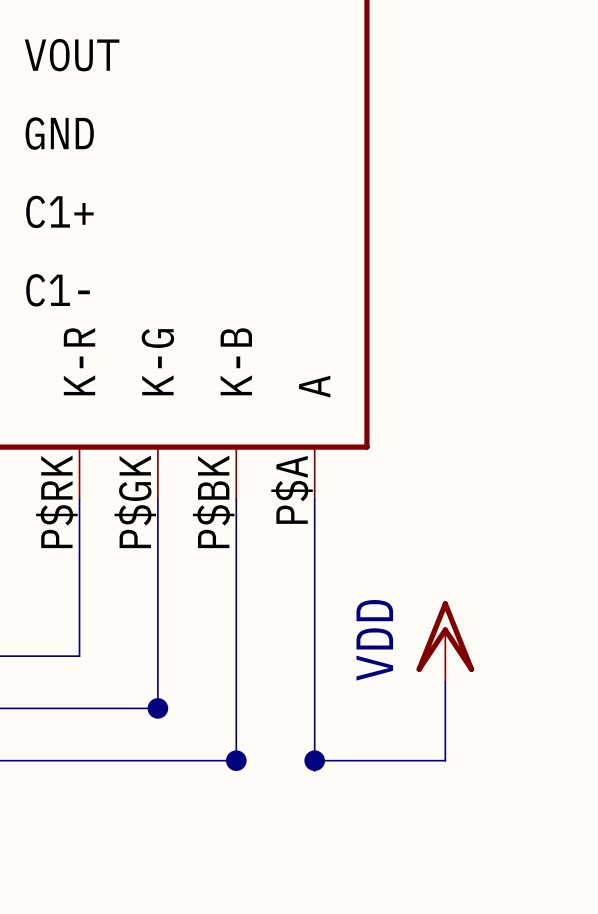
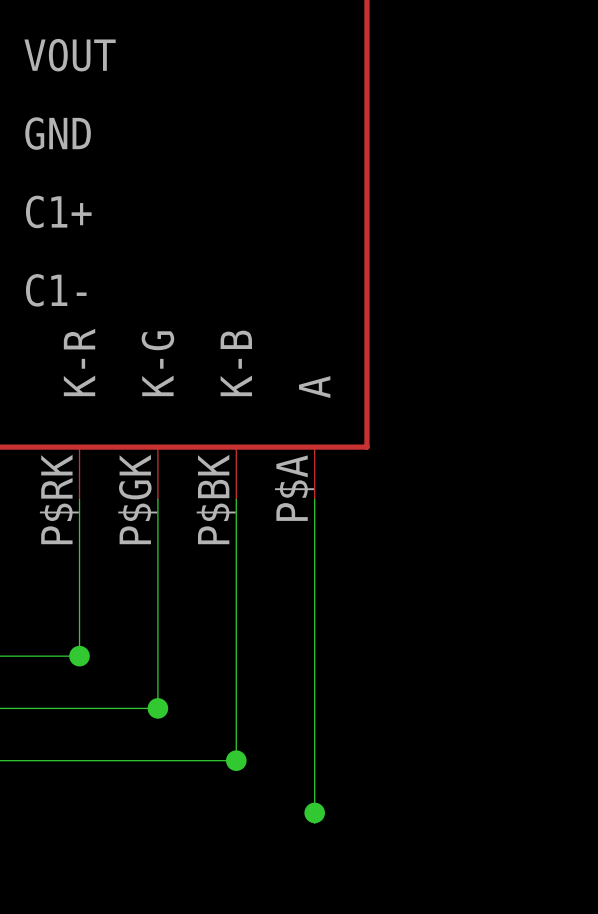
power symbol: VDD (445, 641) -> none
junction: none -> (79, 656)
wire: (445, 682) (445, 760) (314, 760) -> none
junction position: (314, 760) -> (314, 812)
wire: none -> (314, 771) (314, 823)

